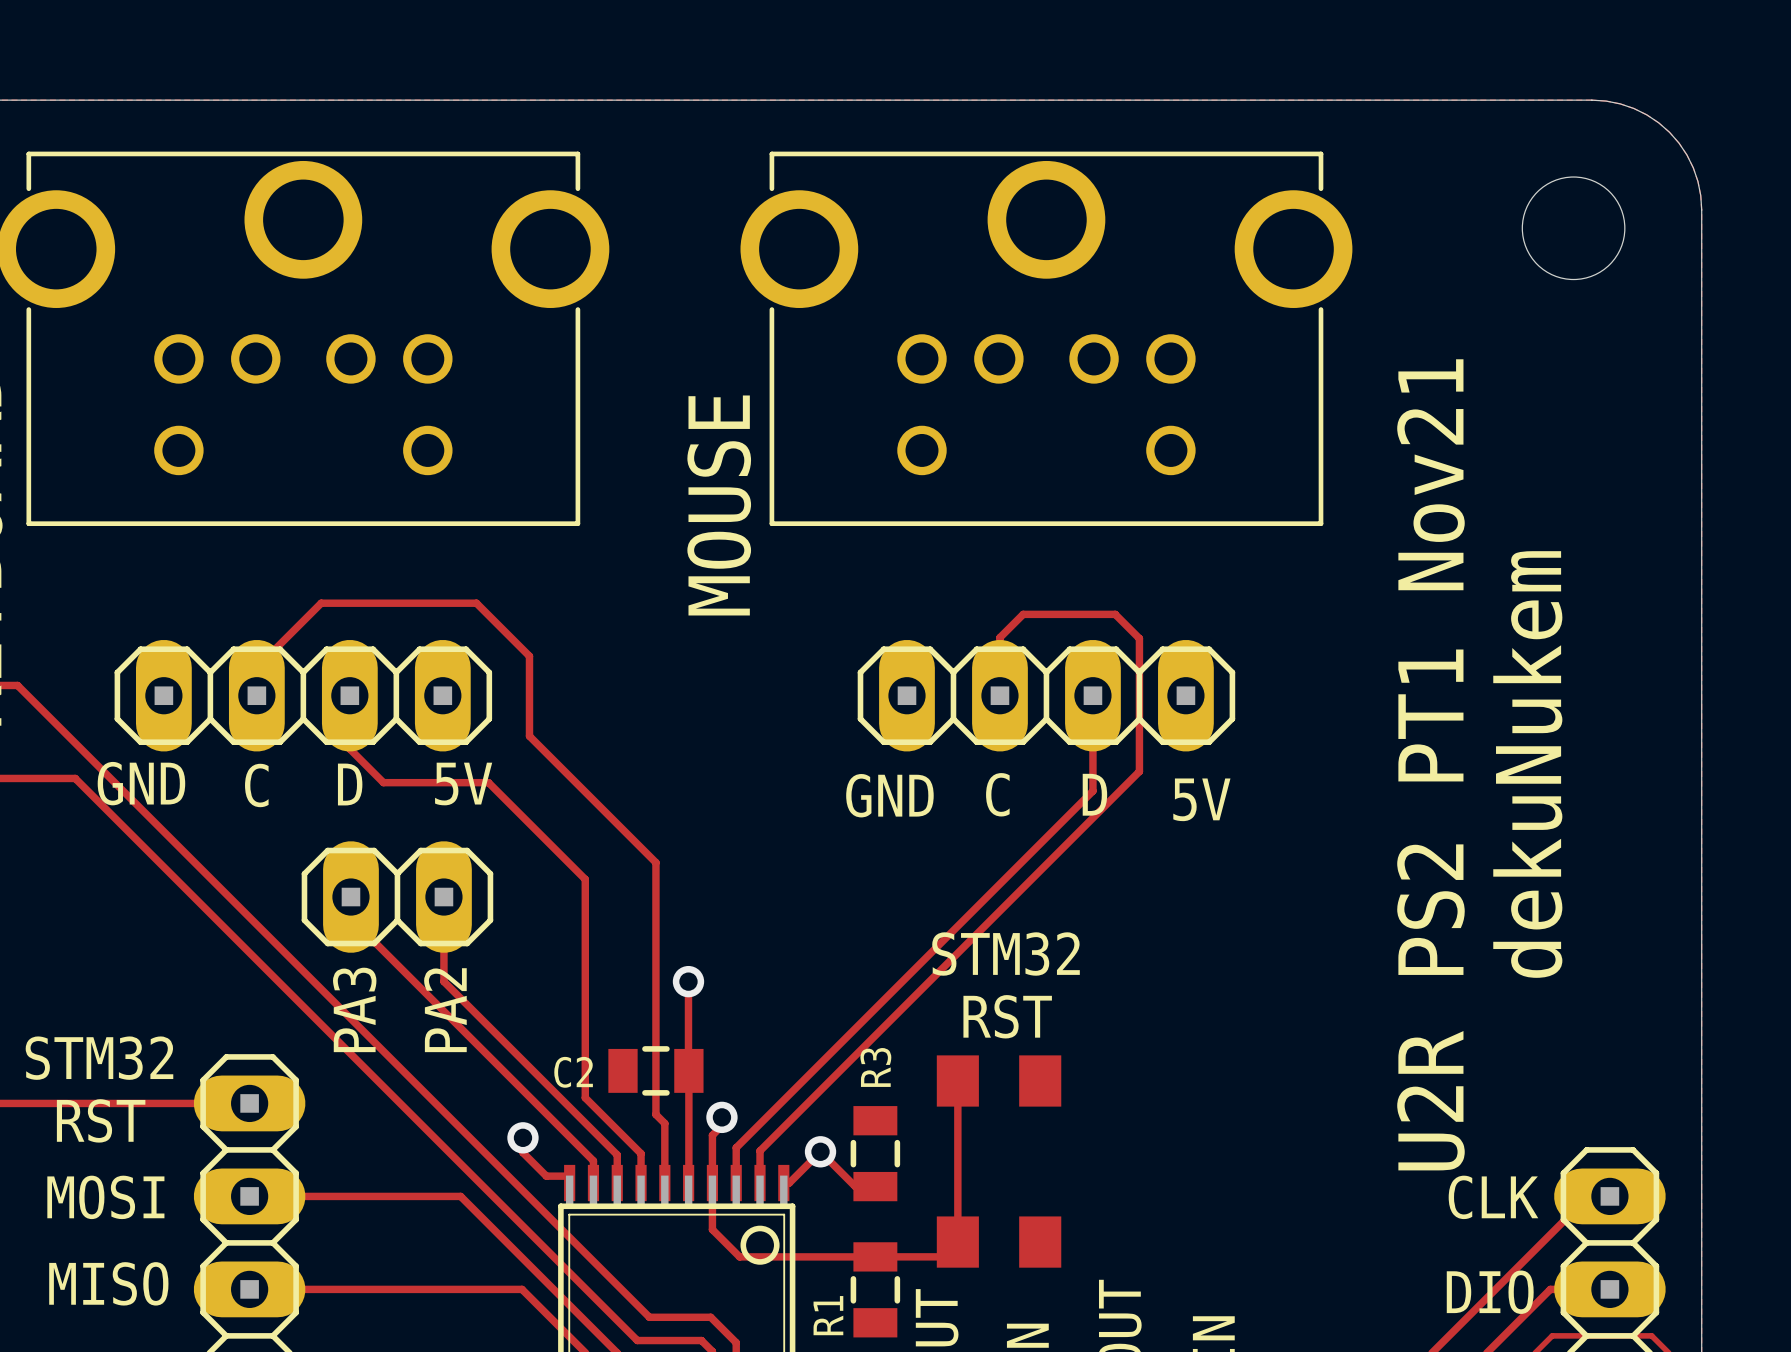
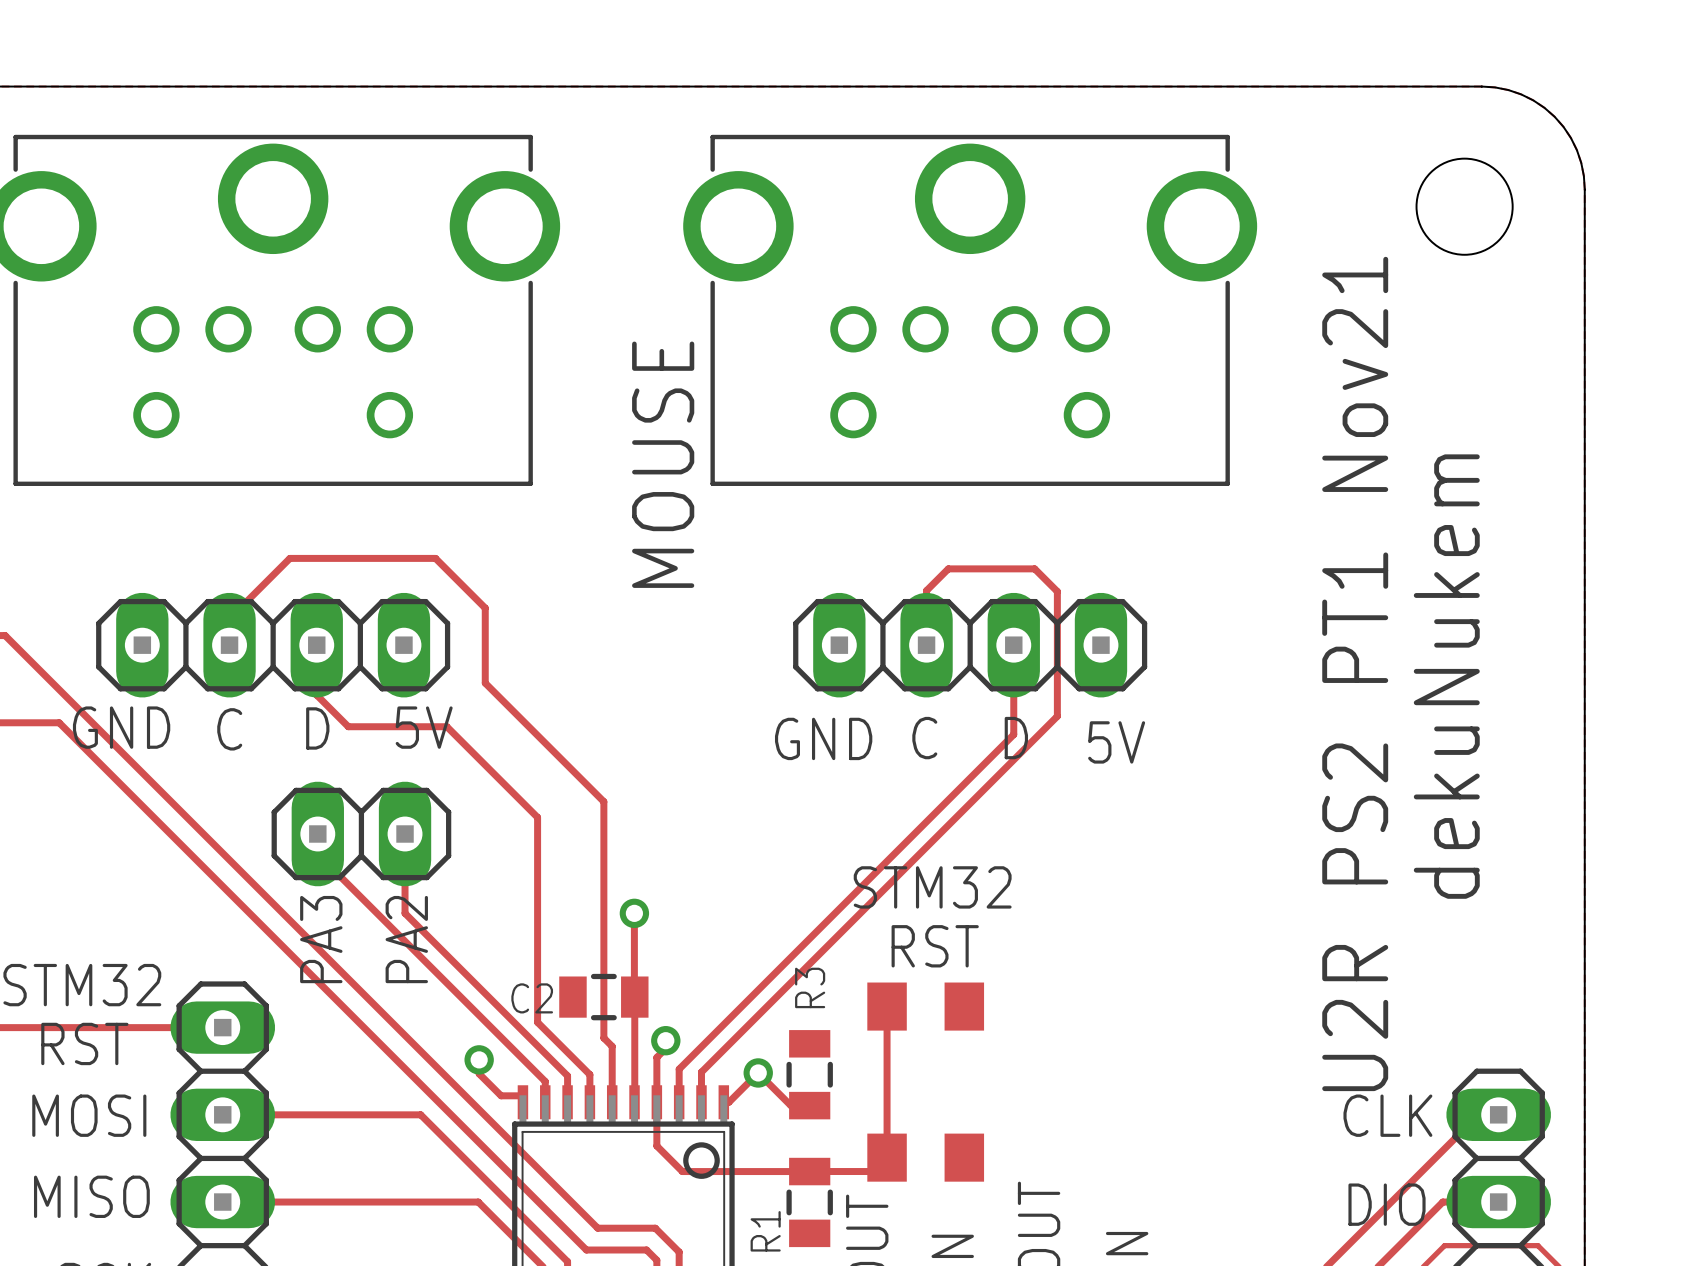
text position: U2R PS2 PT1 Nov21 (1430, 764) -> U2R PS2 PT1 Nov21 (1355, 673)
text position: dekuNukem (1527, 764) -> dekuNukem (1446, 676)

